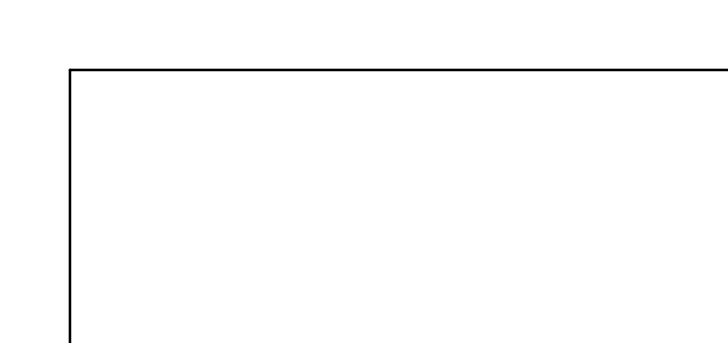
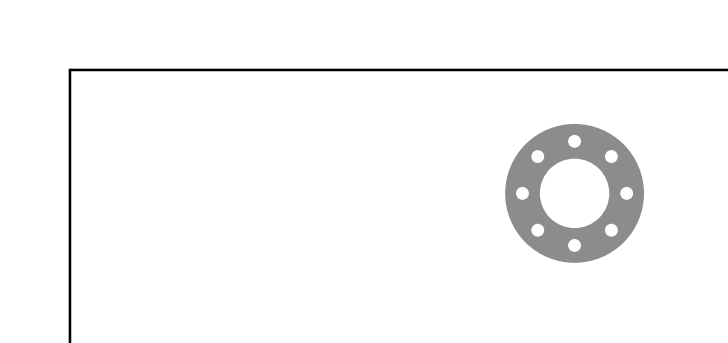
part: none -> (574, 193)

